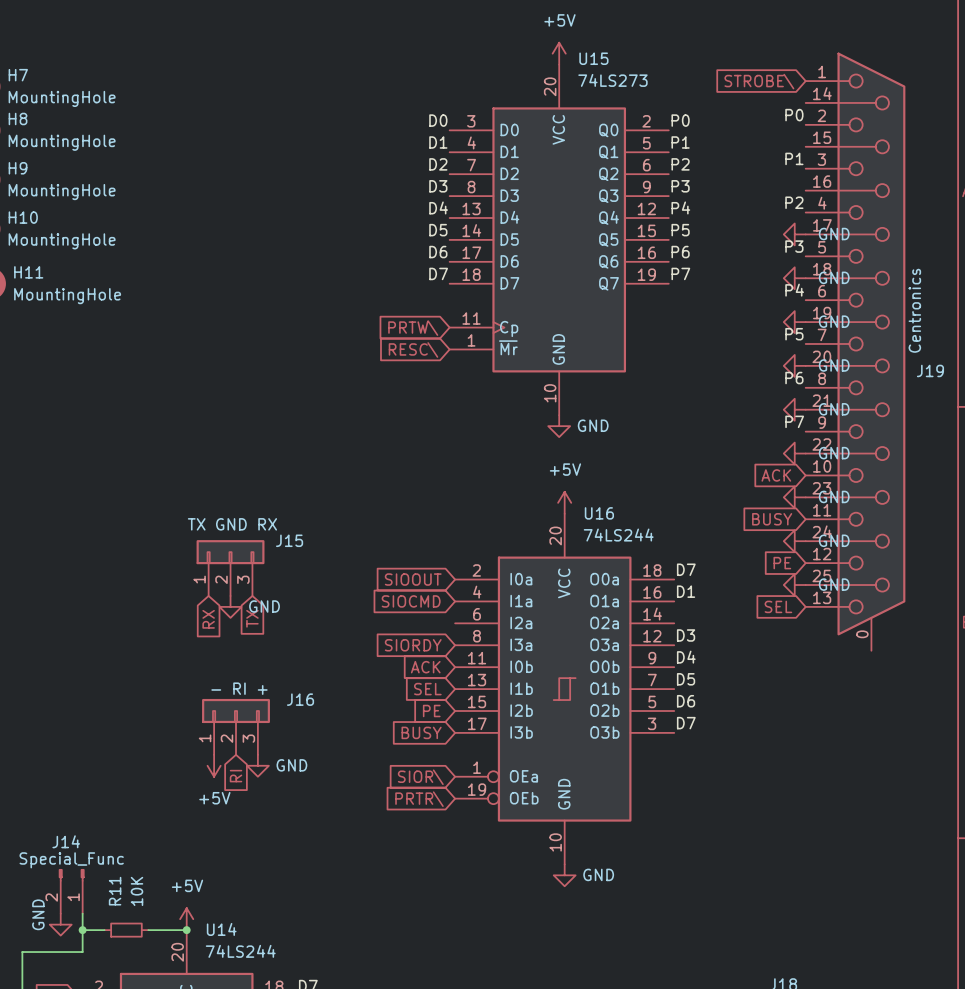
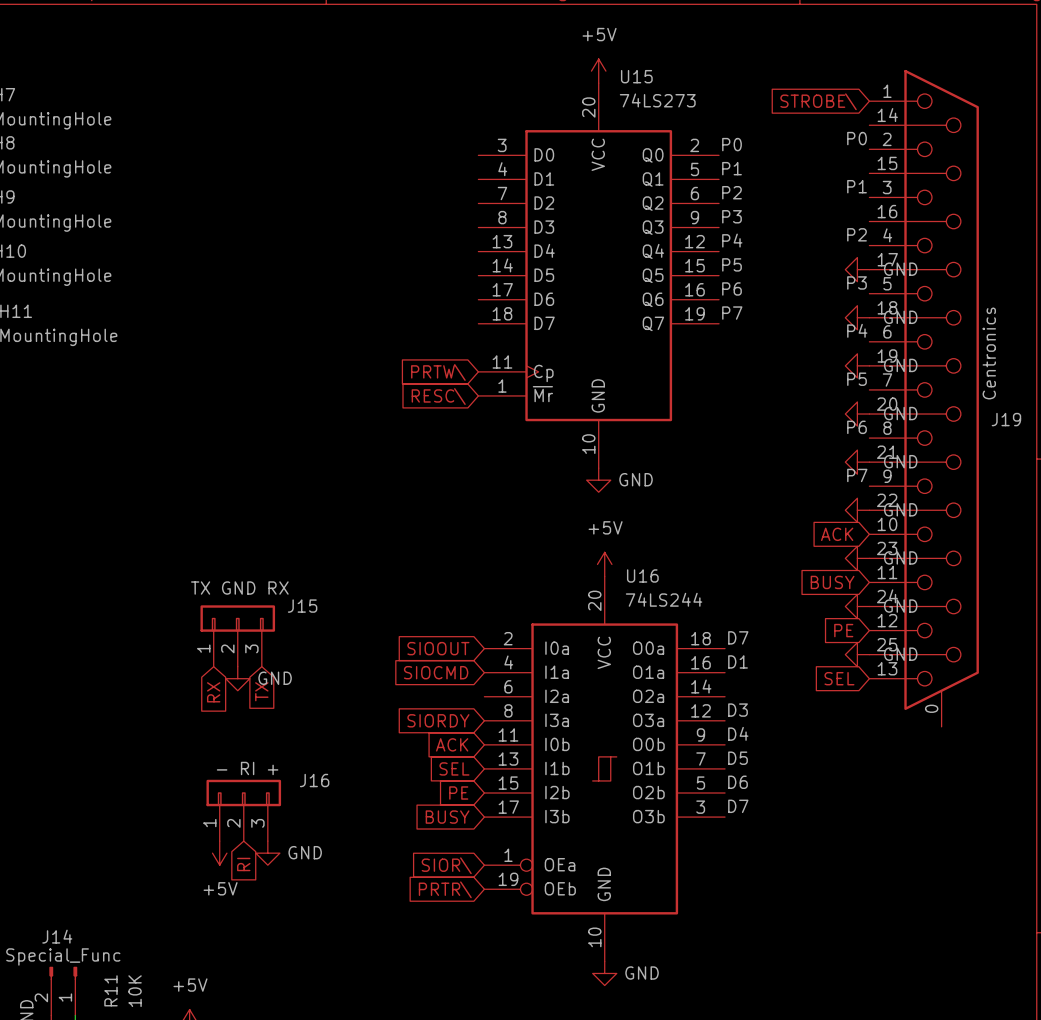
label: D0 (438, 120) -> none
label: D1 (438, 142) -> none
label: D2 (438, 164) -> none
label: D3 (438, 186) -> none
label: D4 (438, 207) -> none
label: D5 (438, 230) -> none
label: D6 (438, 252) -> none
label: D7 (438, 273) -> none

